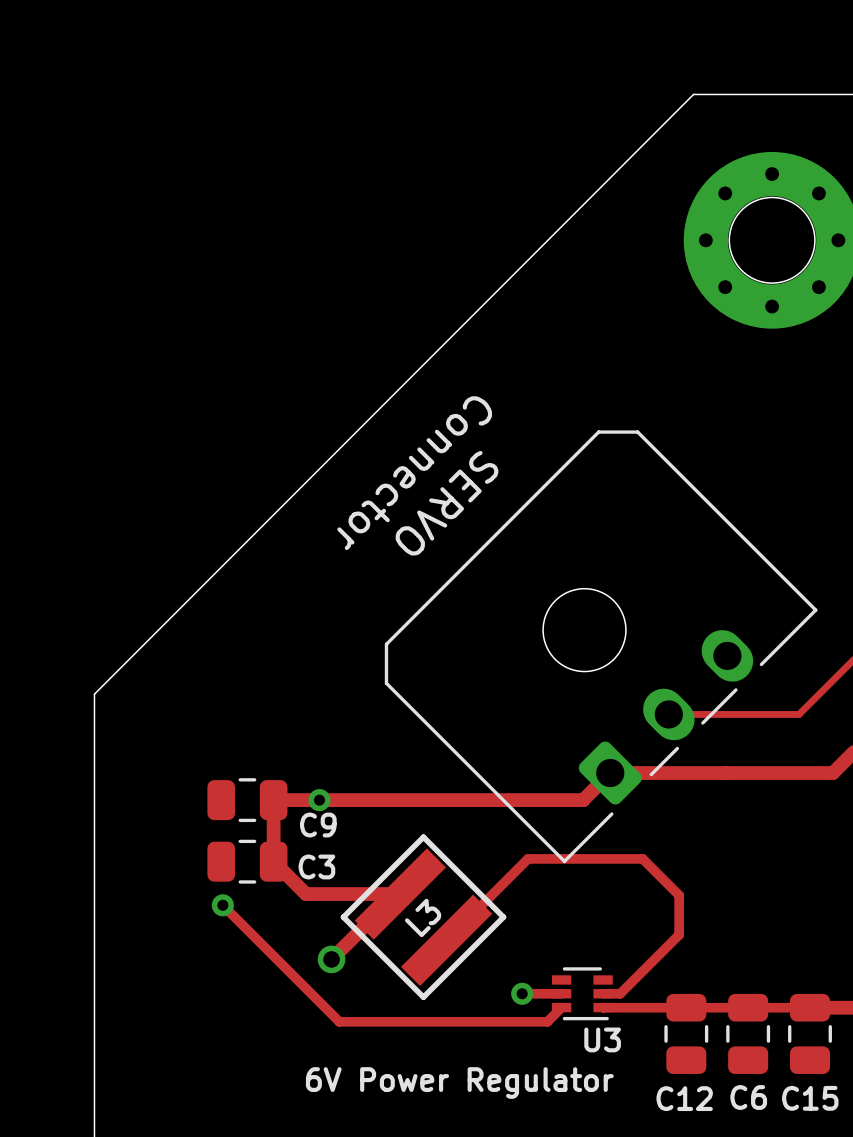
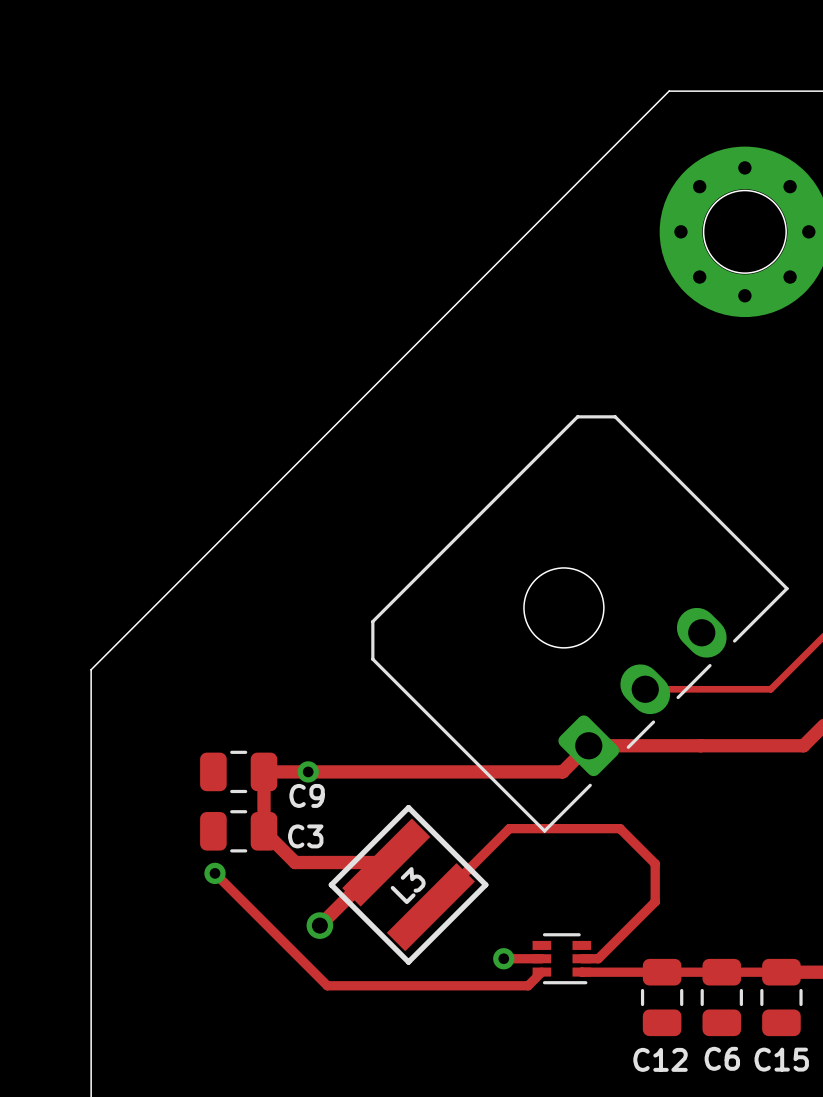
text: Connector (414, 473) -> none
text: SERVO (447, 503) -> none
U3 name: U3 (602, 1039) -> none
text: 6V Power Regulator (459, 1083) -> none

